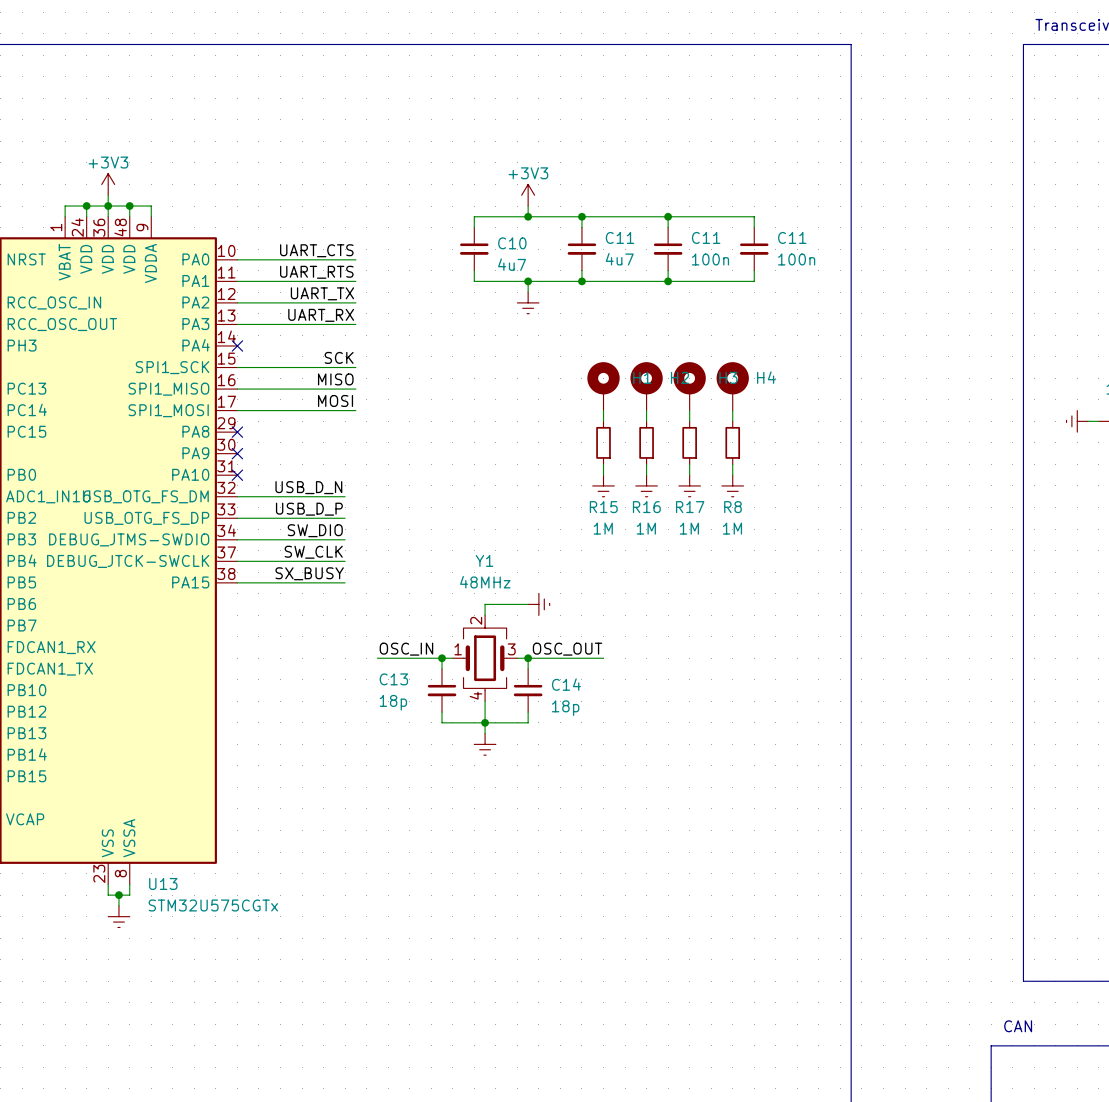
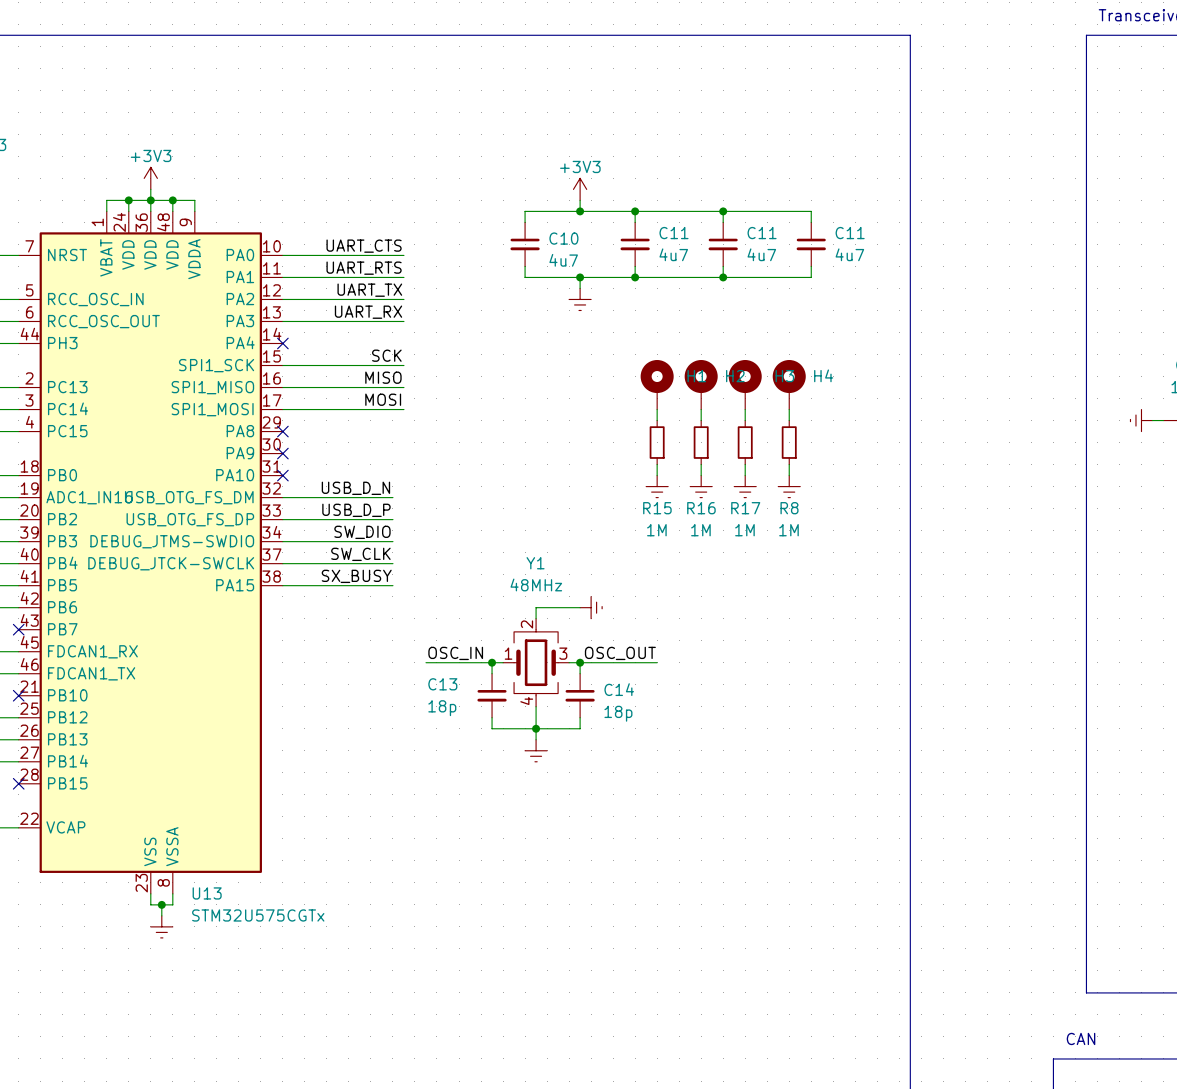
C11 value: 100n (710, 259) -> 4u7 (761, 254)
C11 value: 100n (796, 259) -> 4u7 (849, 254)

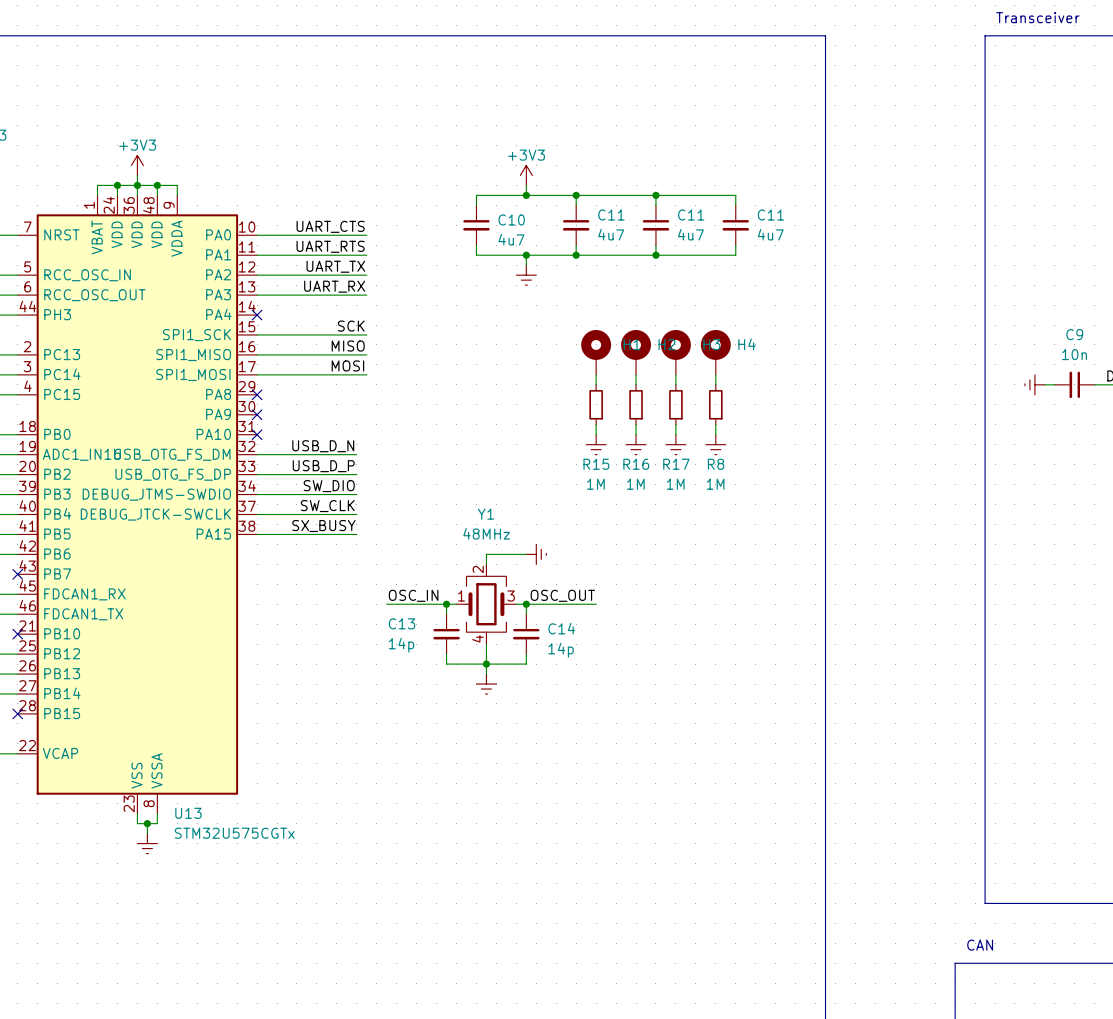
C13 value: 18p (442, 708) -> 14p (401, 645)
C14 value: 18p (618, 713) -> 14p (561, 650)

